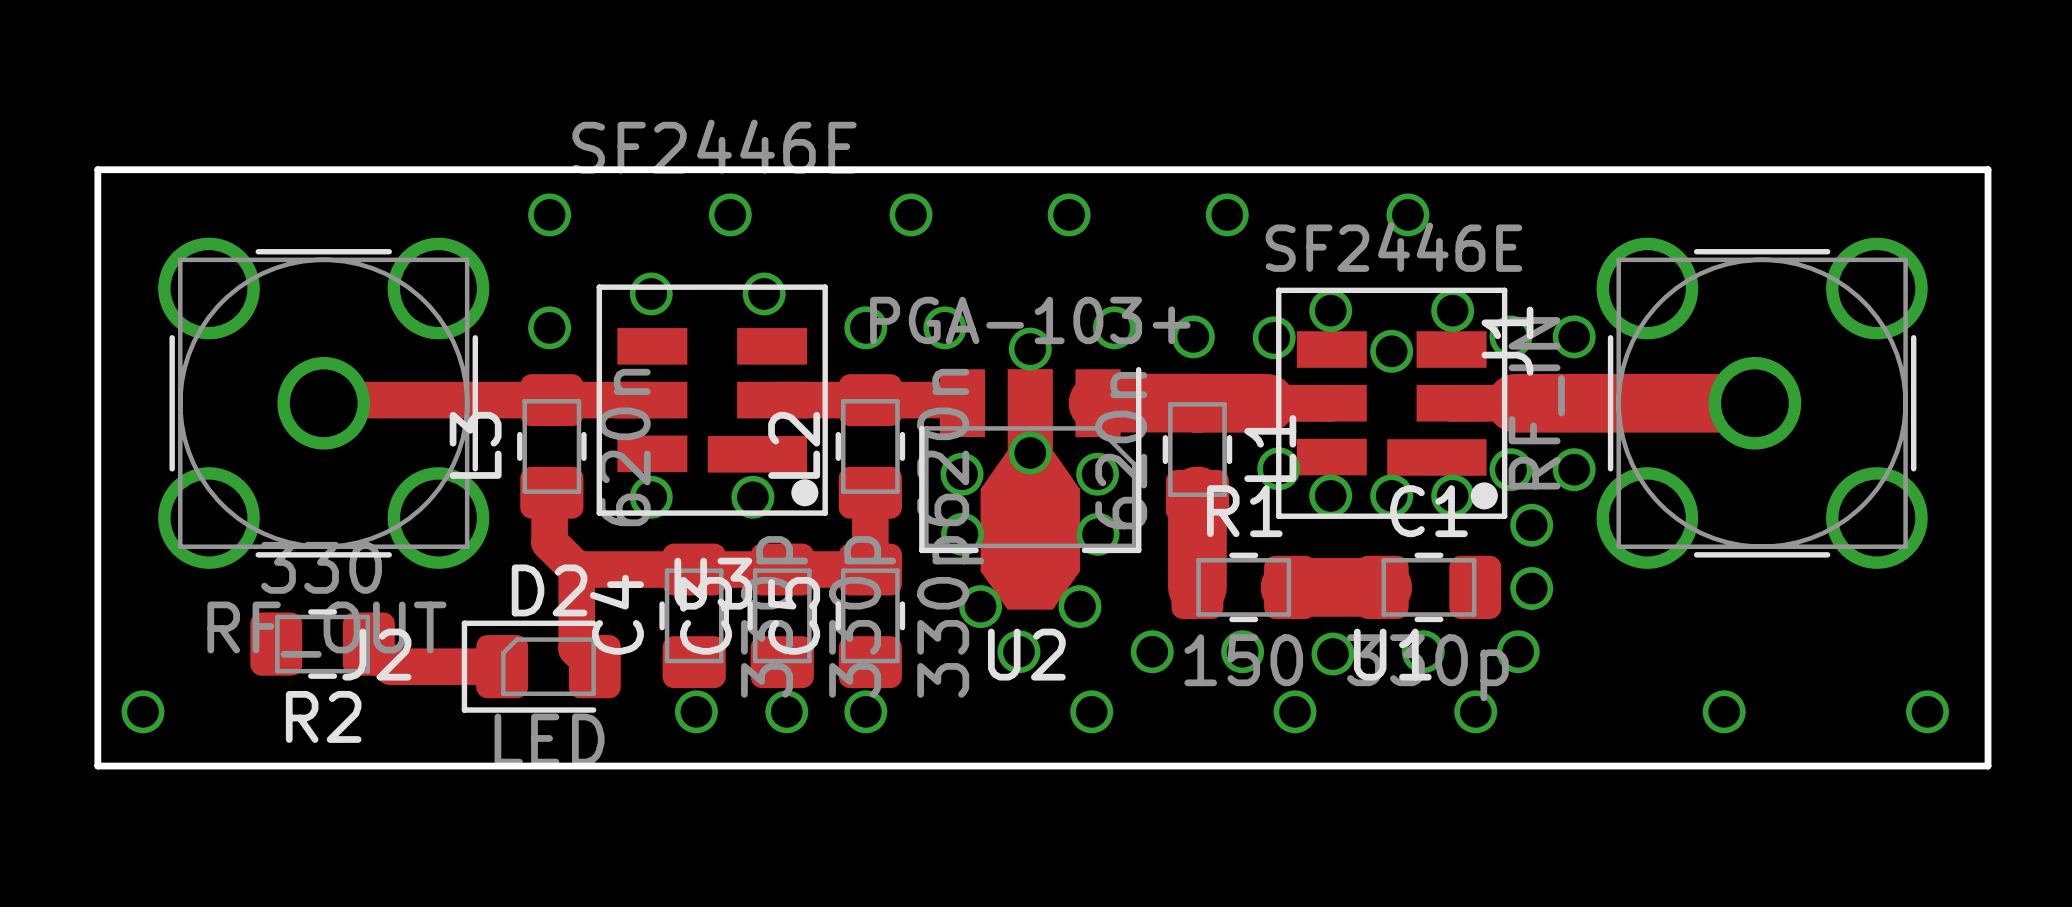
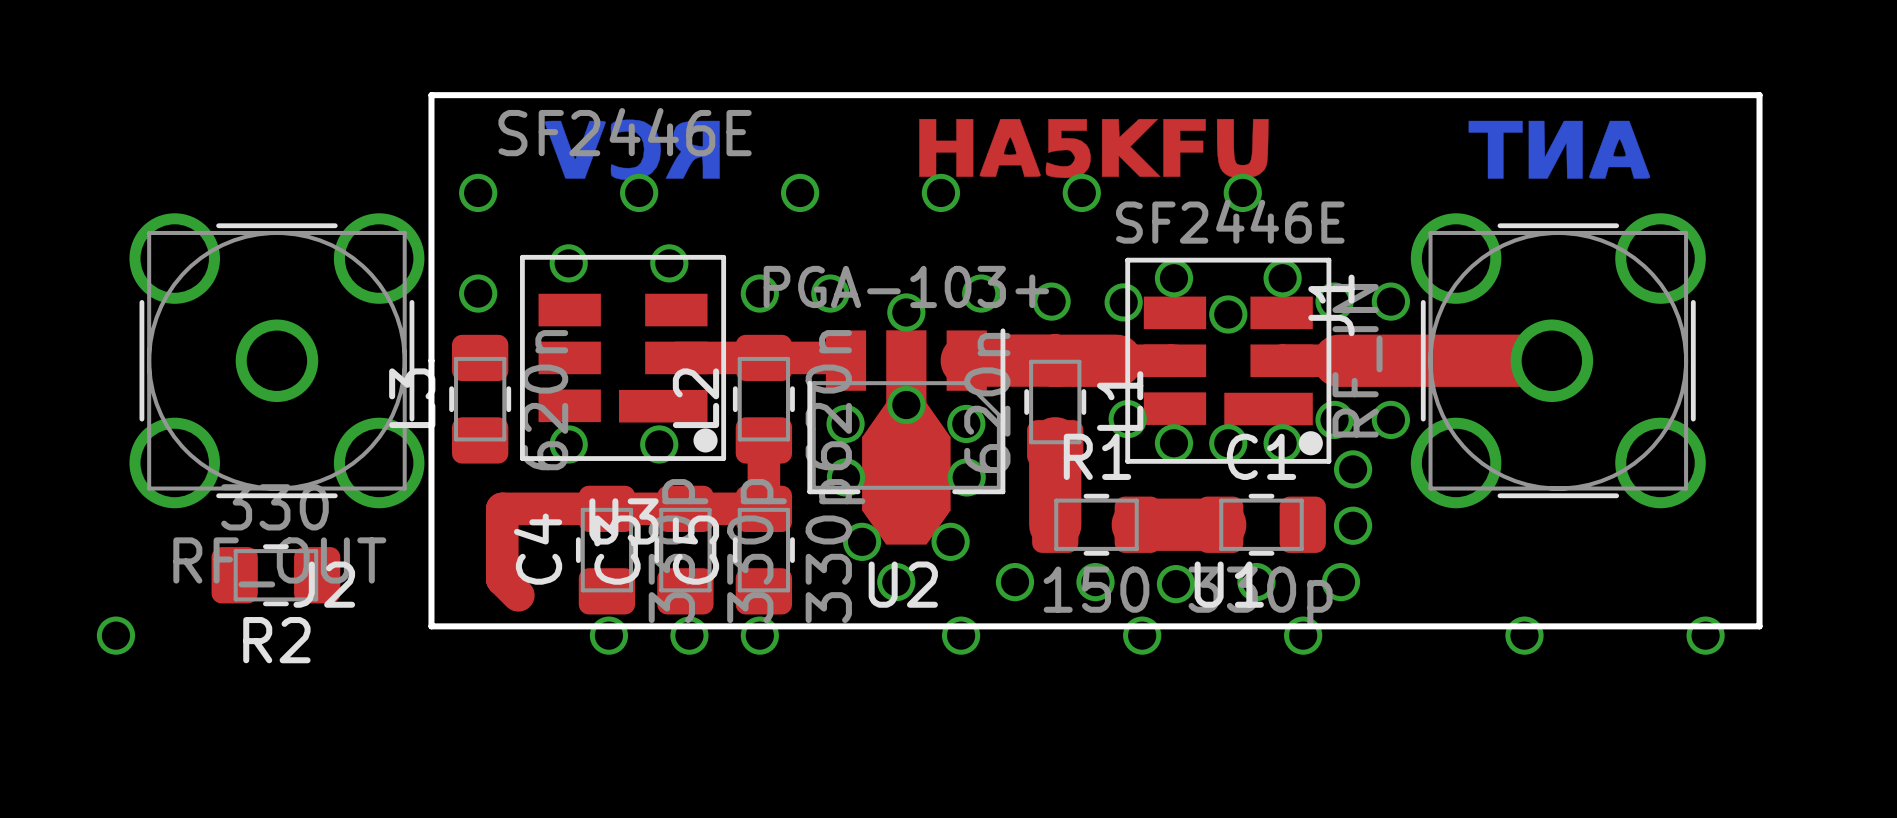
drawing: none -> [919, 118, 1269, 179]
drawing: none -> [544, 119, 720, 180]
drawing: none -> [1468, 120, 1651, 179]
board edge: (1988, 169) (97, 169) (97, 766) (1988, 766) (1988, 701) -> (1759, 152) (1759, 95) (431, 95) (431, 626) (1759, 626)
top track: (652, 400) (326, 400) (323, 403) -> none
top track: (551, 492) (549, 494) (549, 542) (576, 569) -> none
top track: (368, 644) (391, 666) (502, 666) -> none
D2: LED (541, 666) -> none

